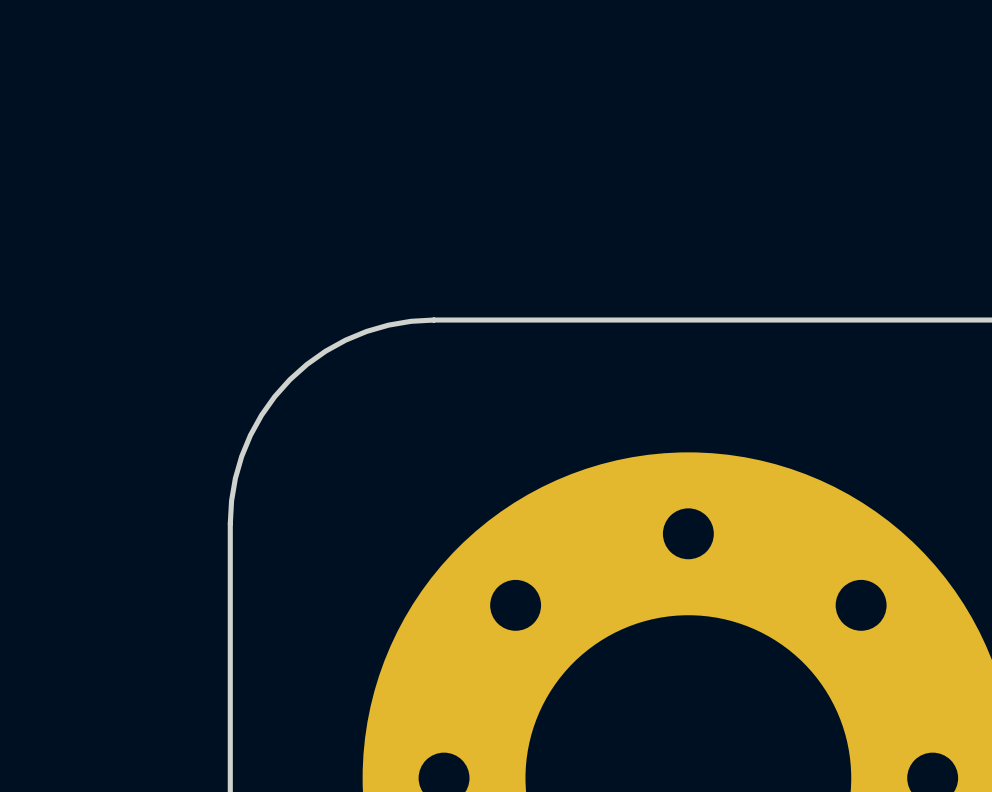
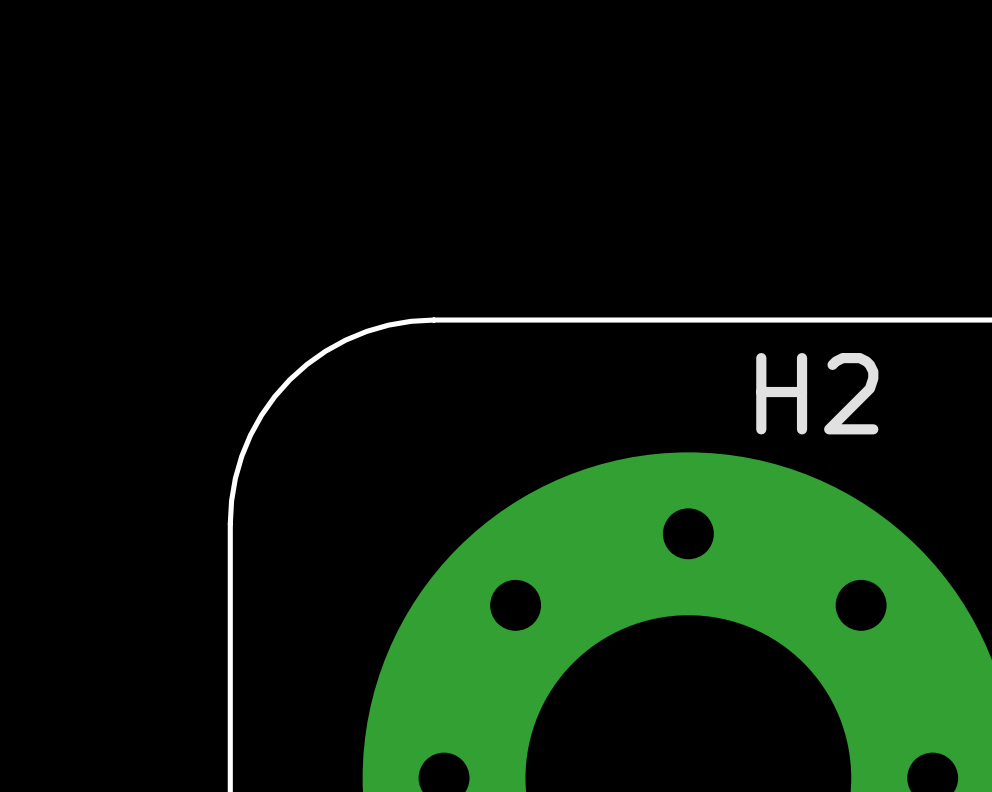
H2 name: none -> H2 (817, 393)

